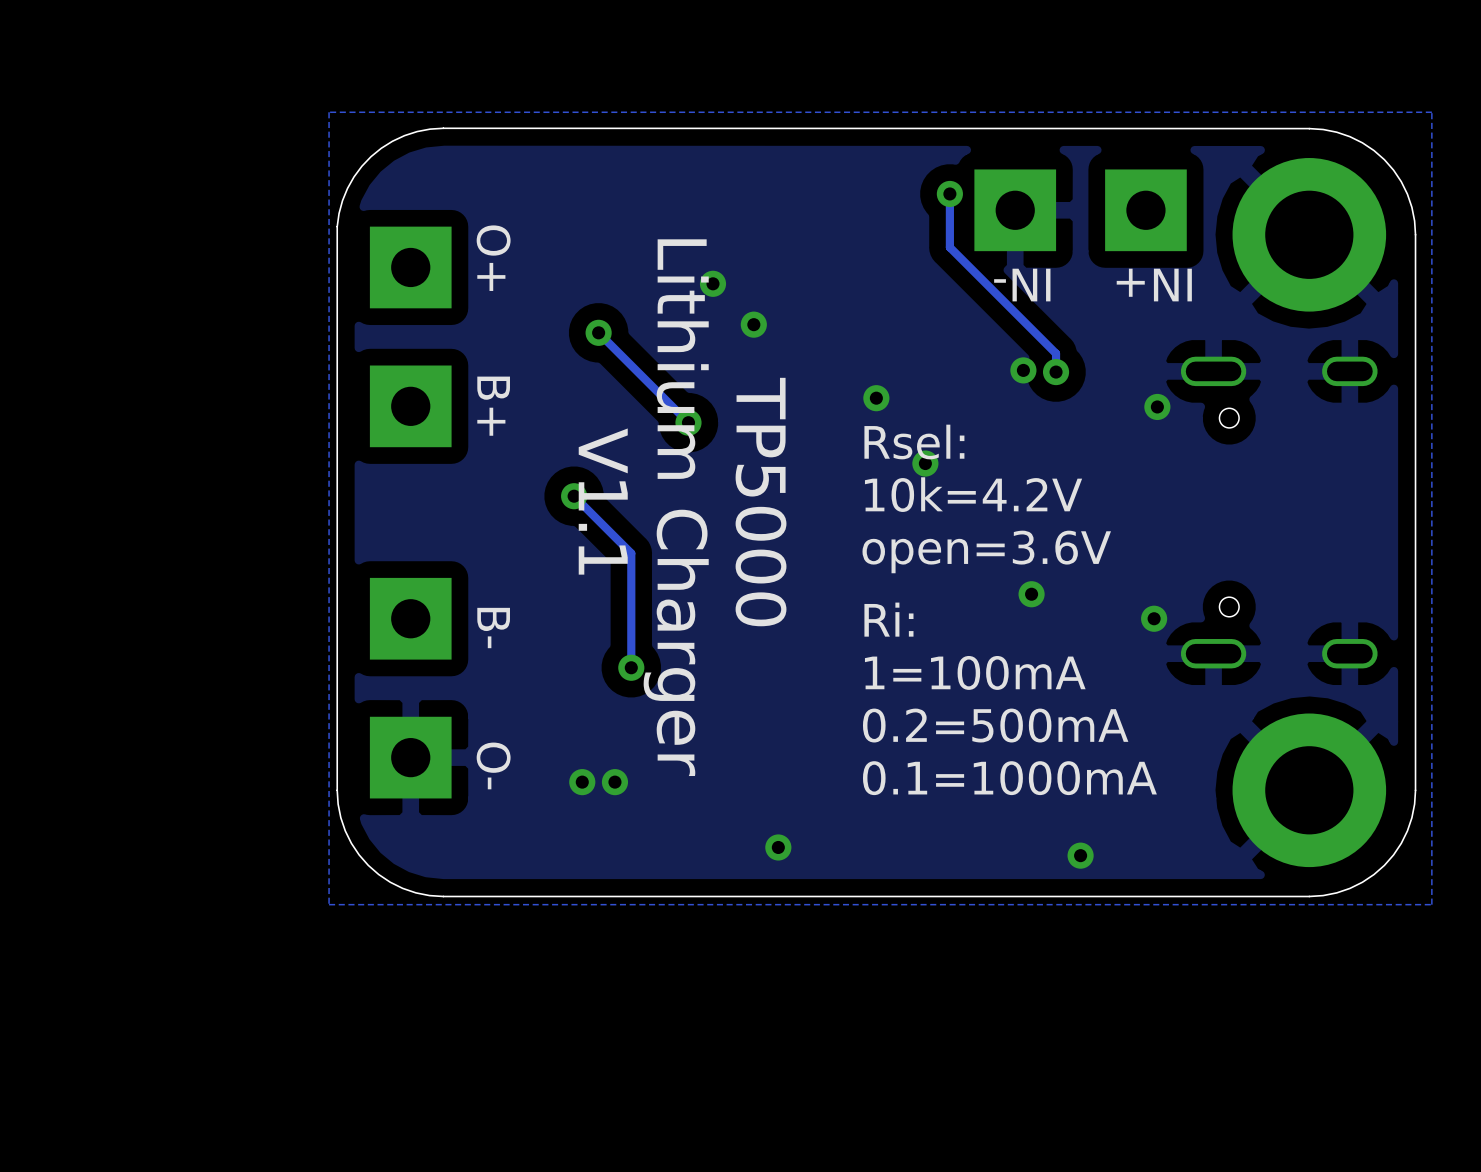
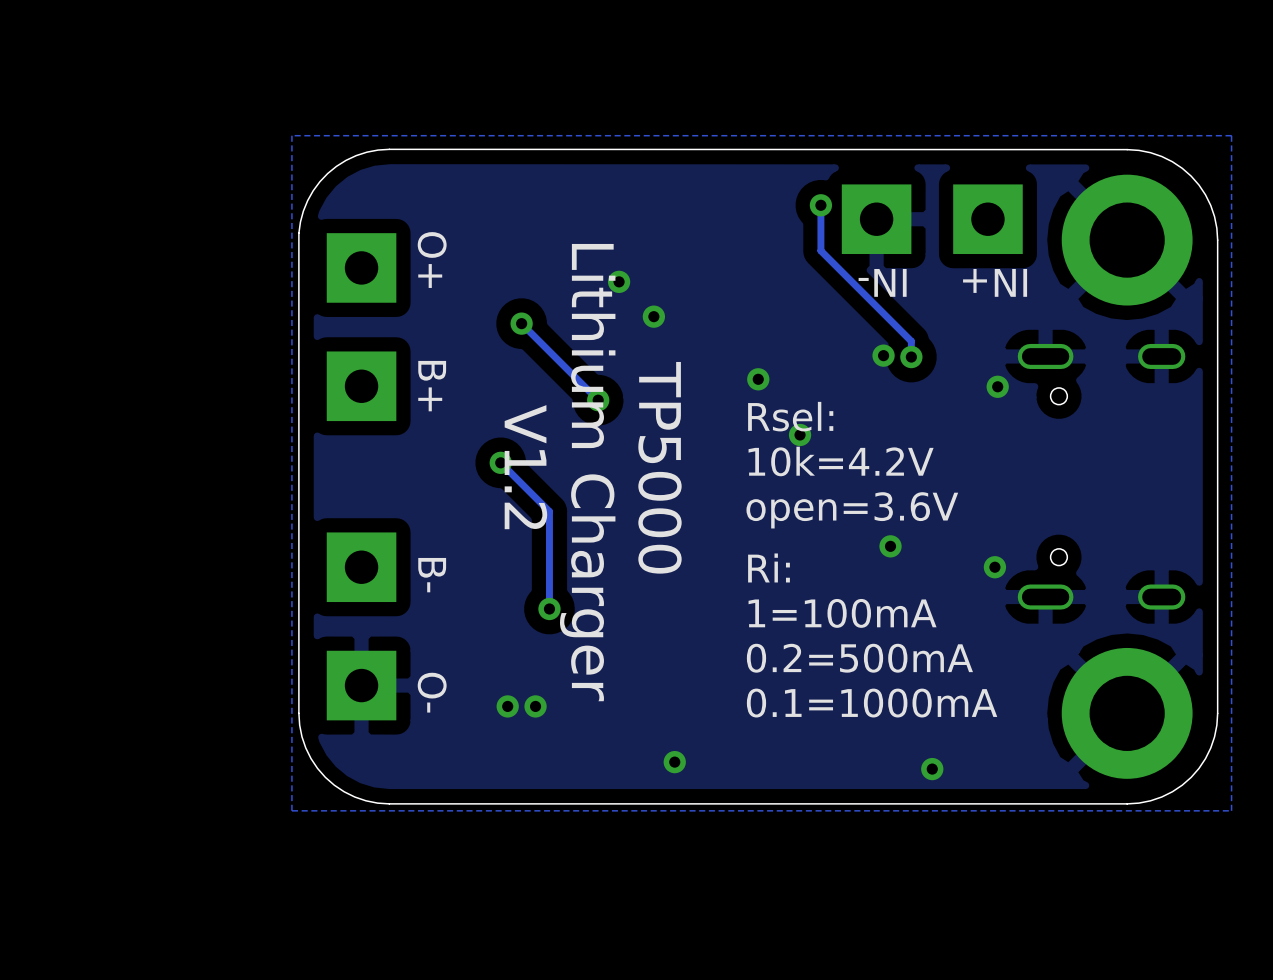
text: V1.1 (603, 501) -> V1.2 (525, 467)

